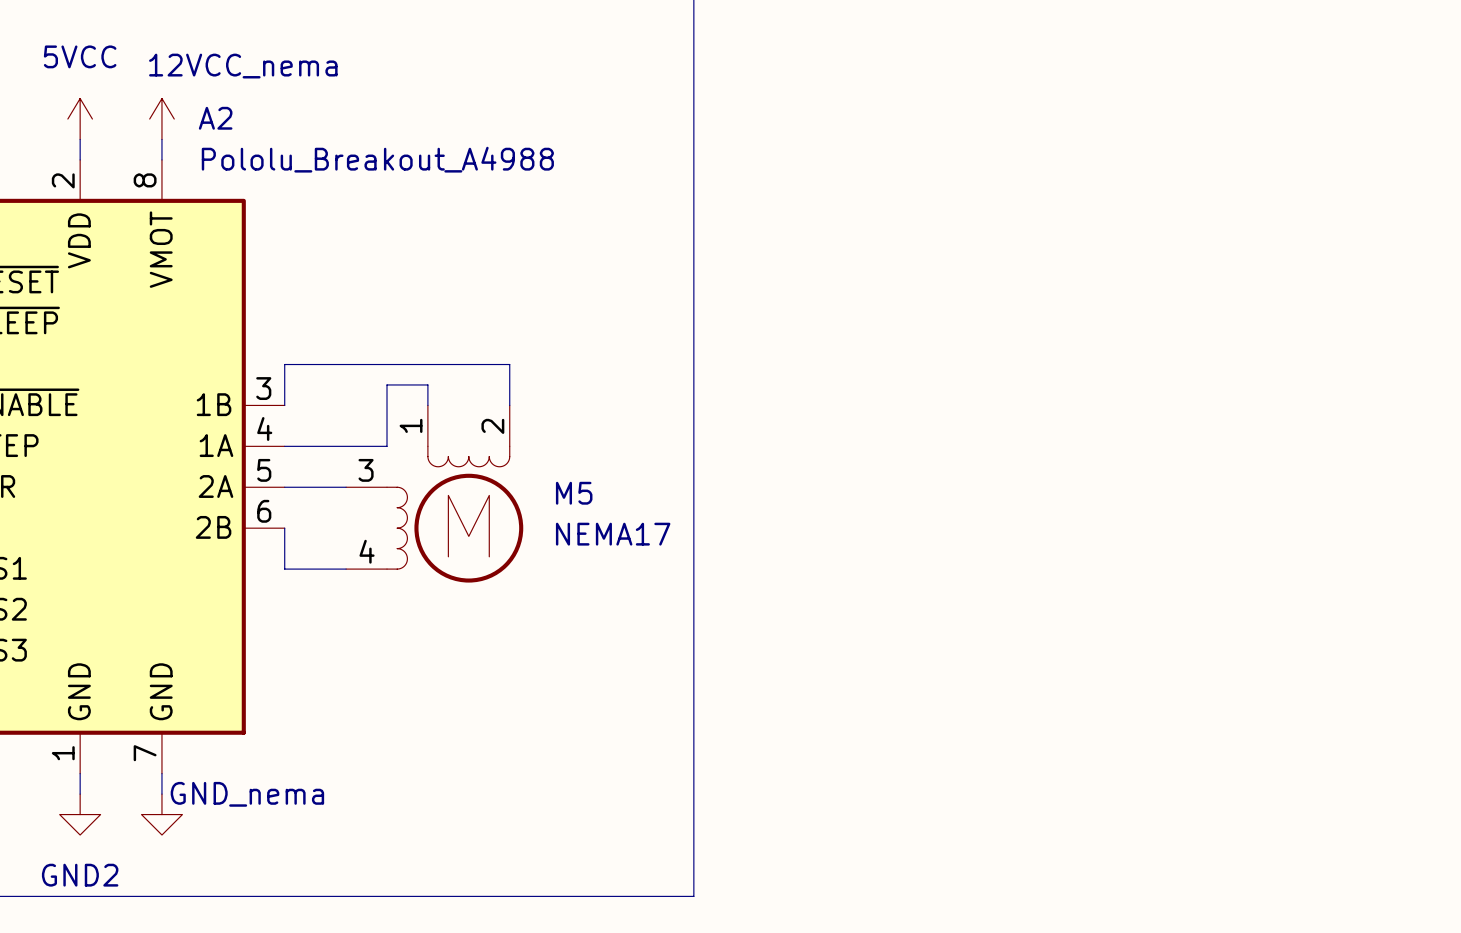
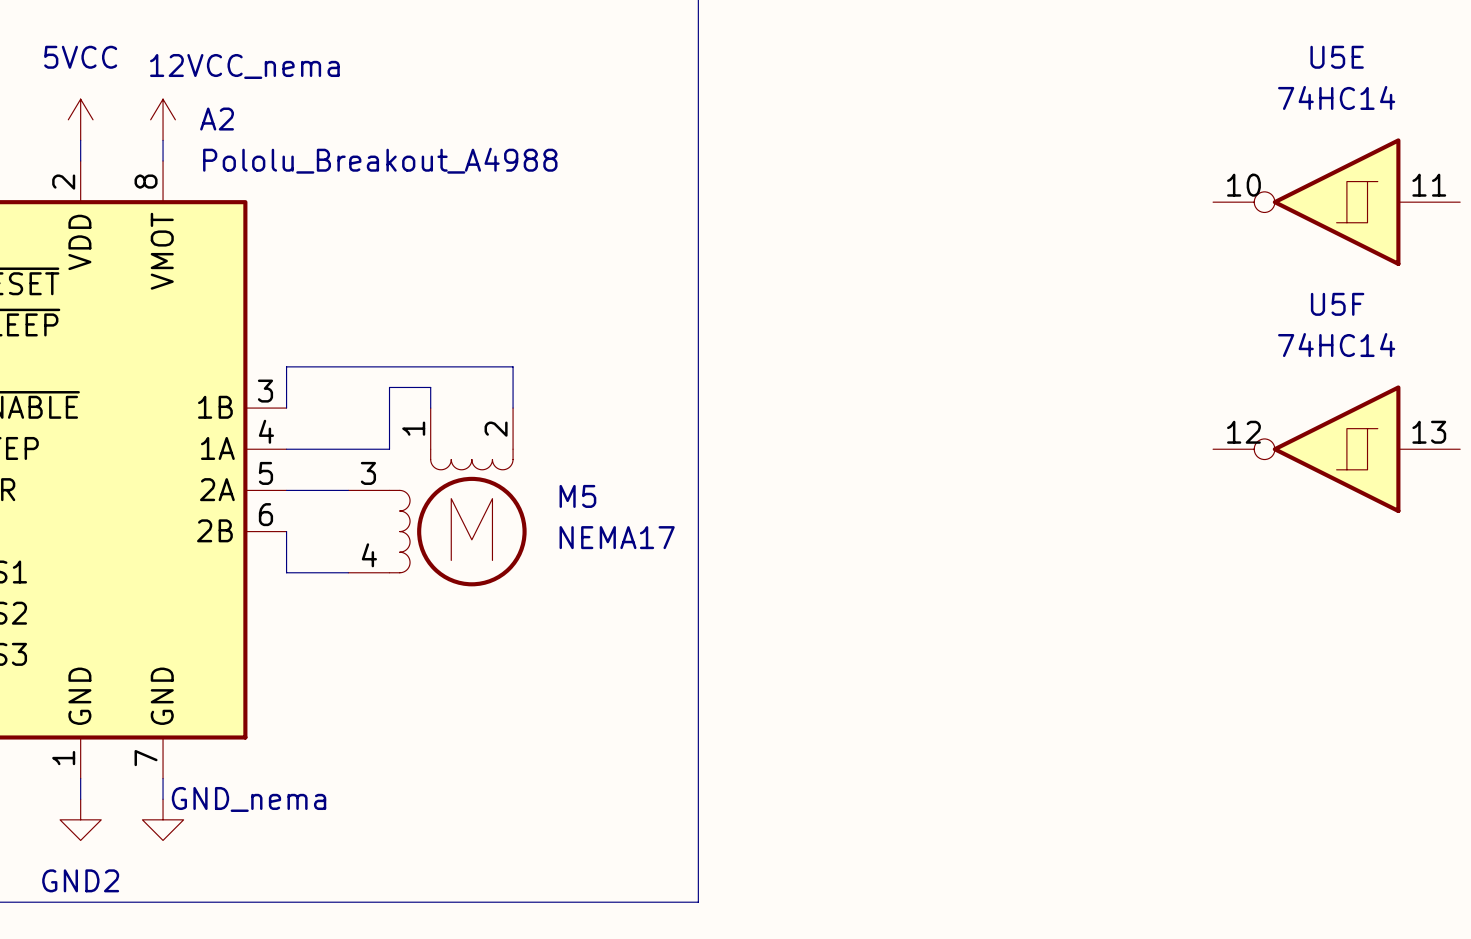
U5E: none -> 74HC14 (1336, 202)
U5F: none -> 74HC14 (1336, 449)

